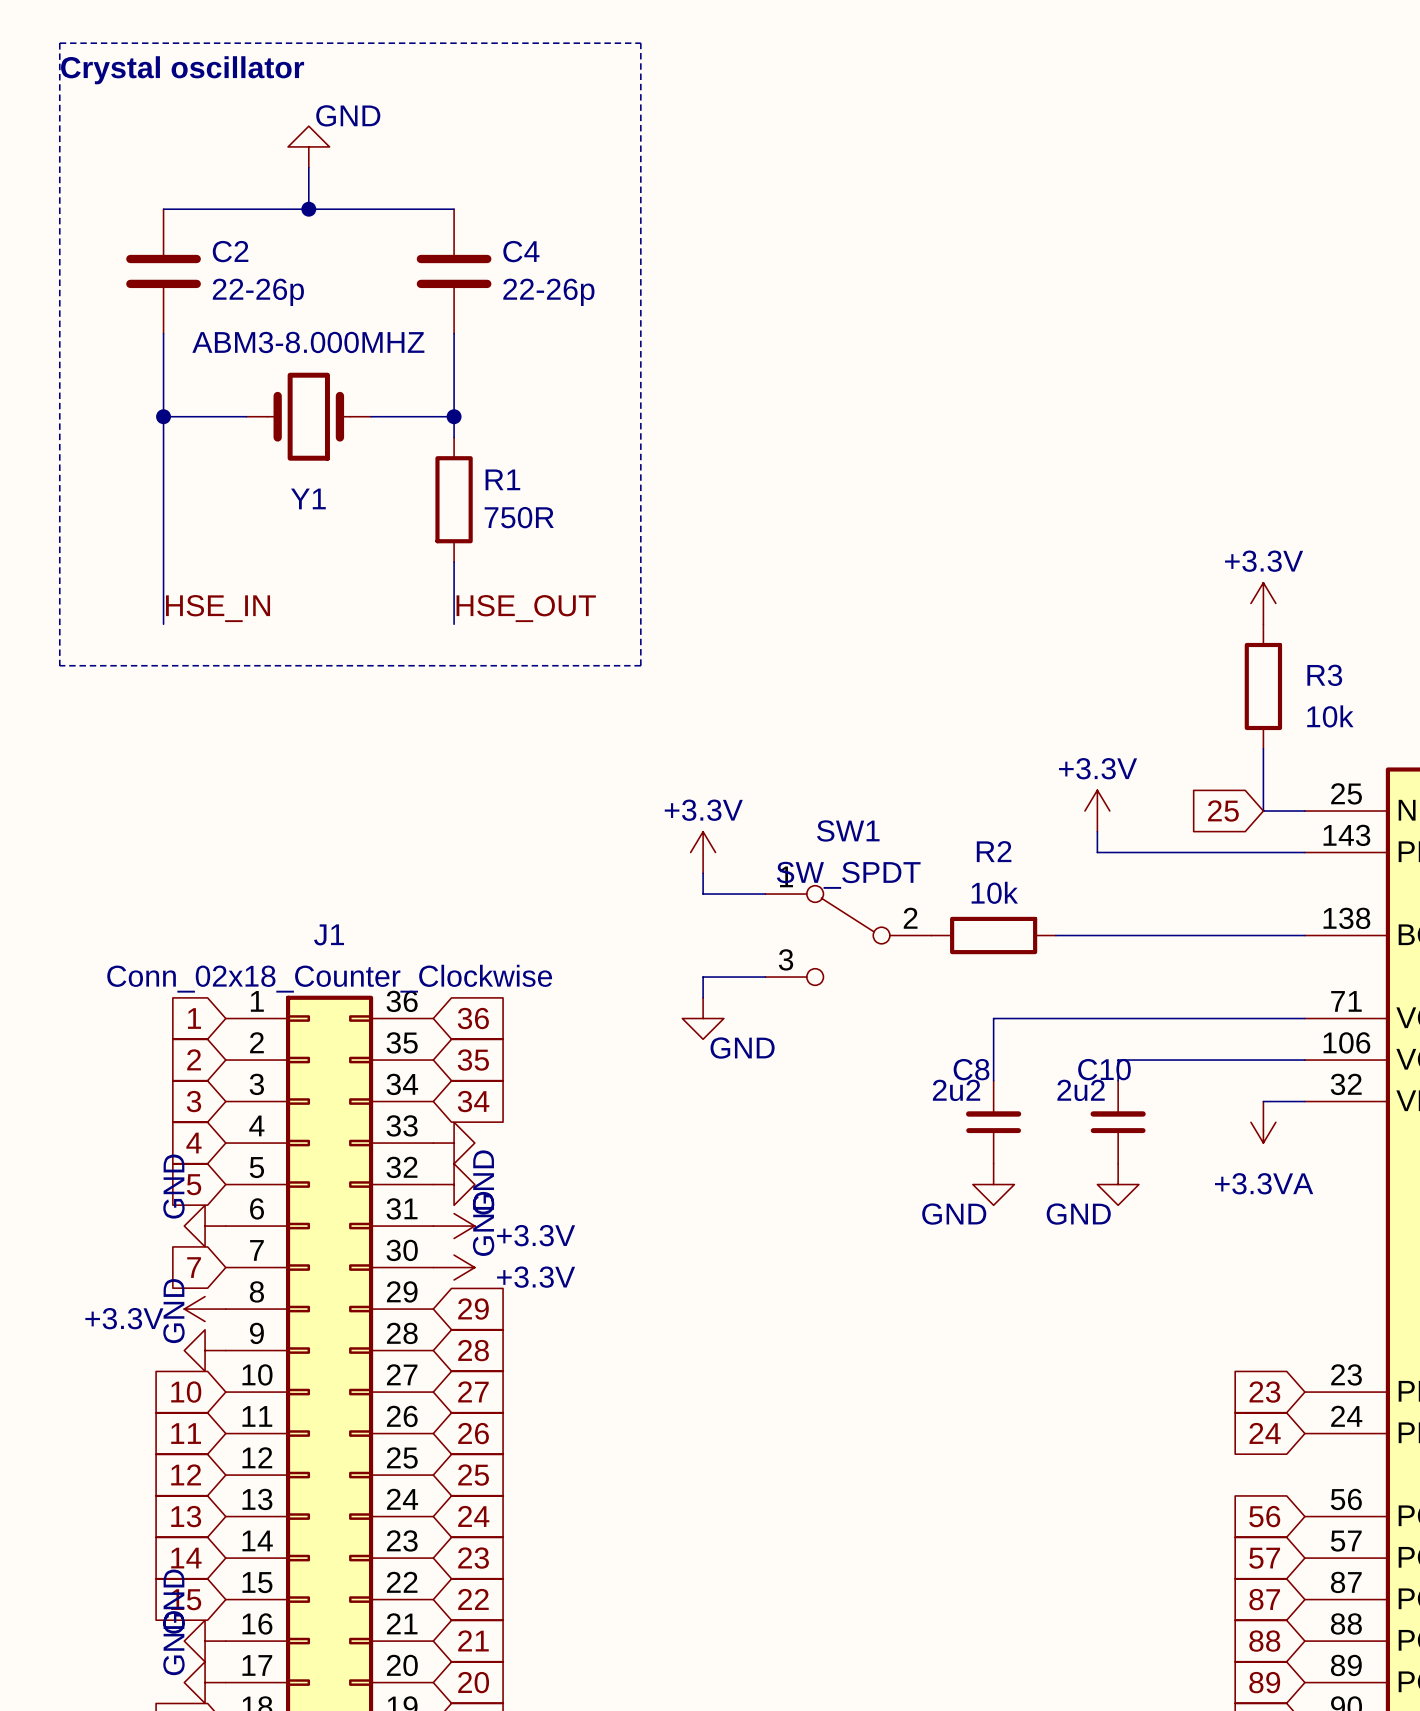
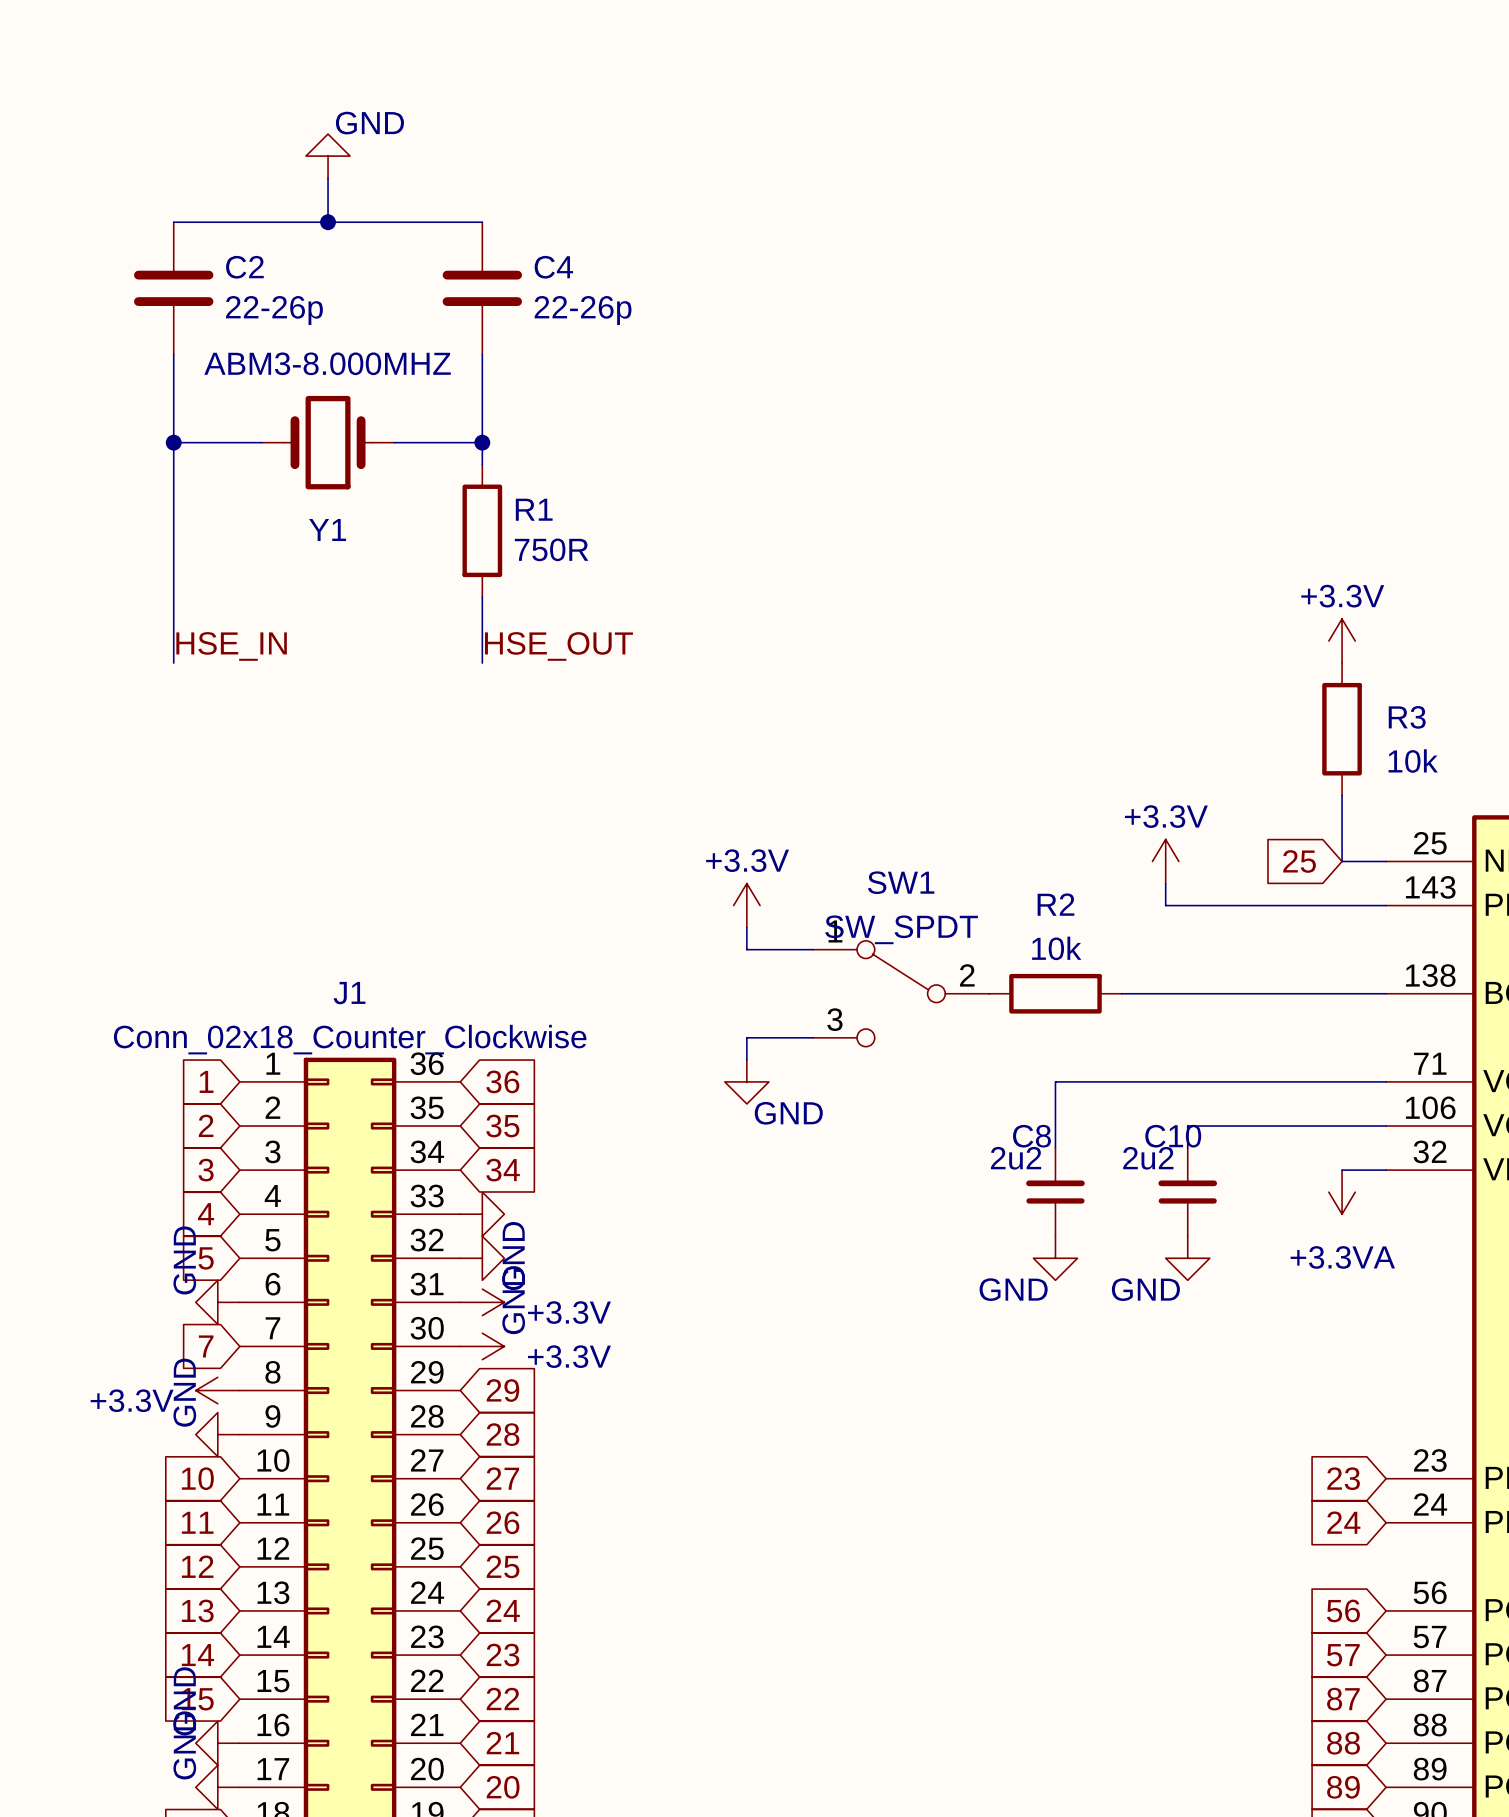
line: (59, 43) (59, 665) (640, 665) (640, 43) (59, 43) -> none
text: Crystal oscillator (182, 70) -> none

